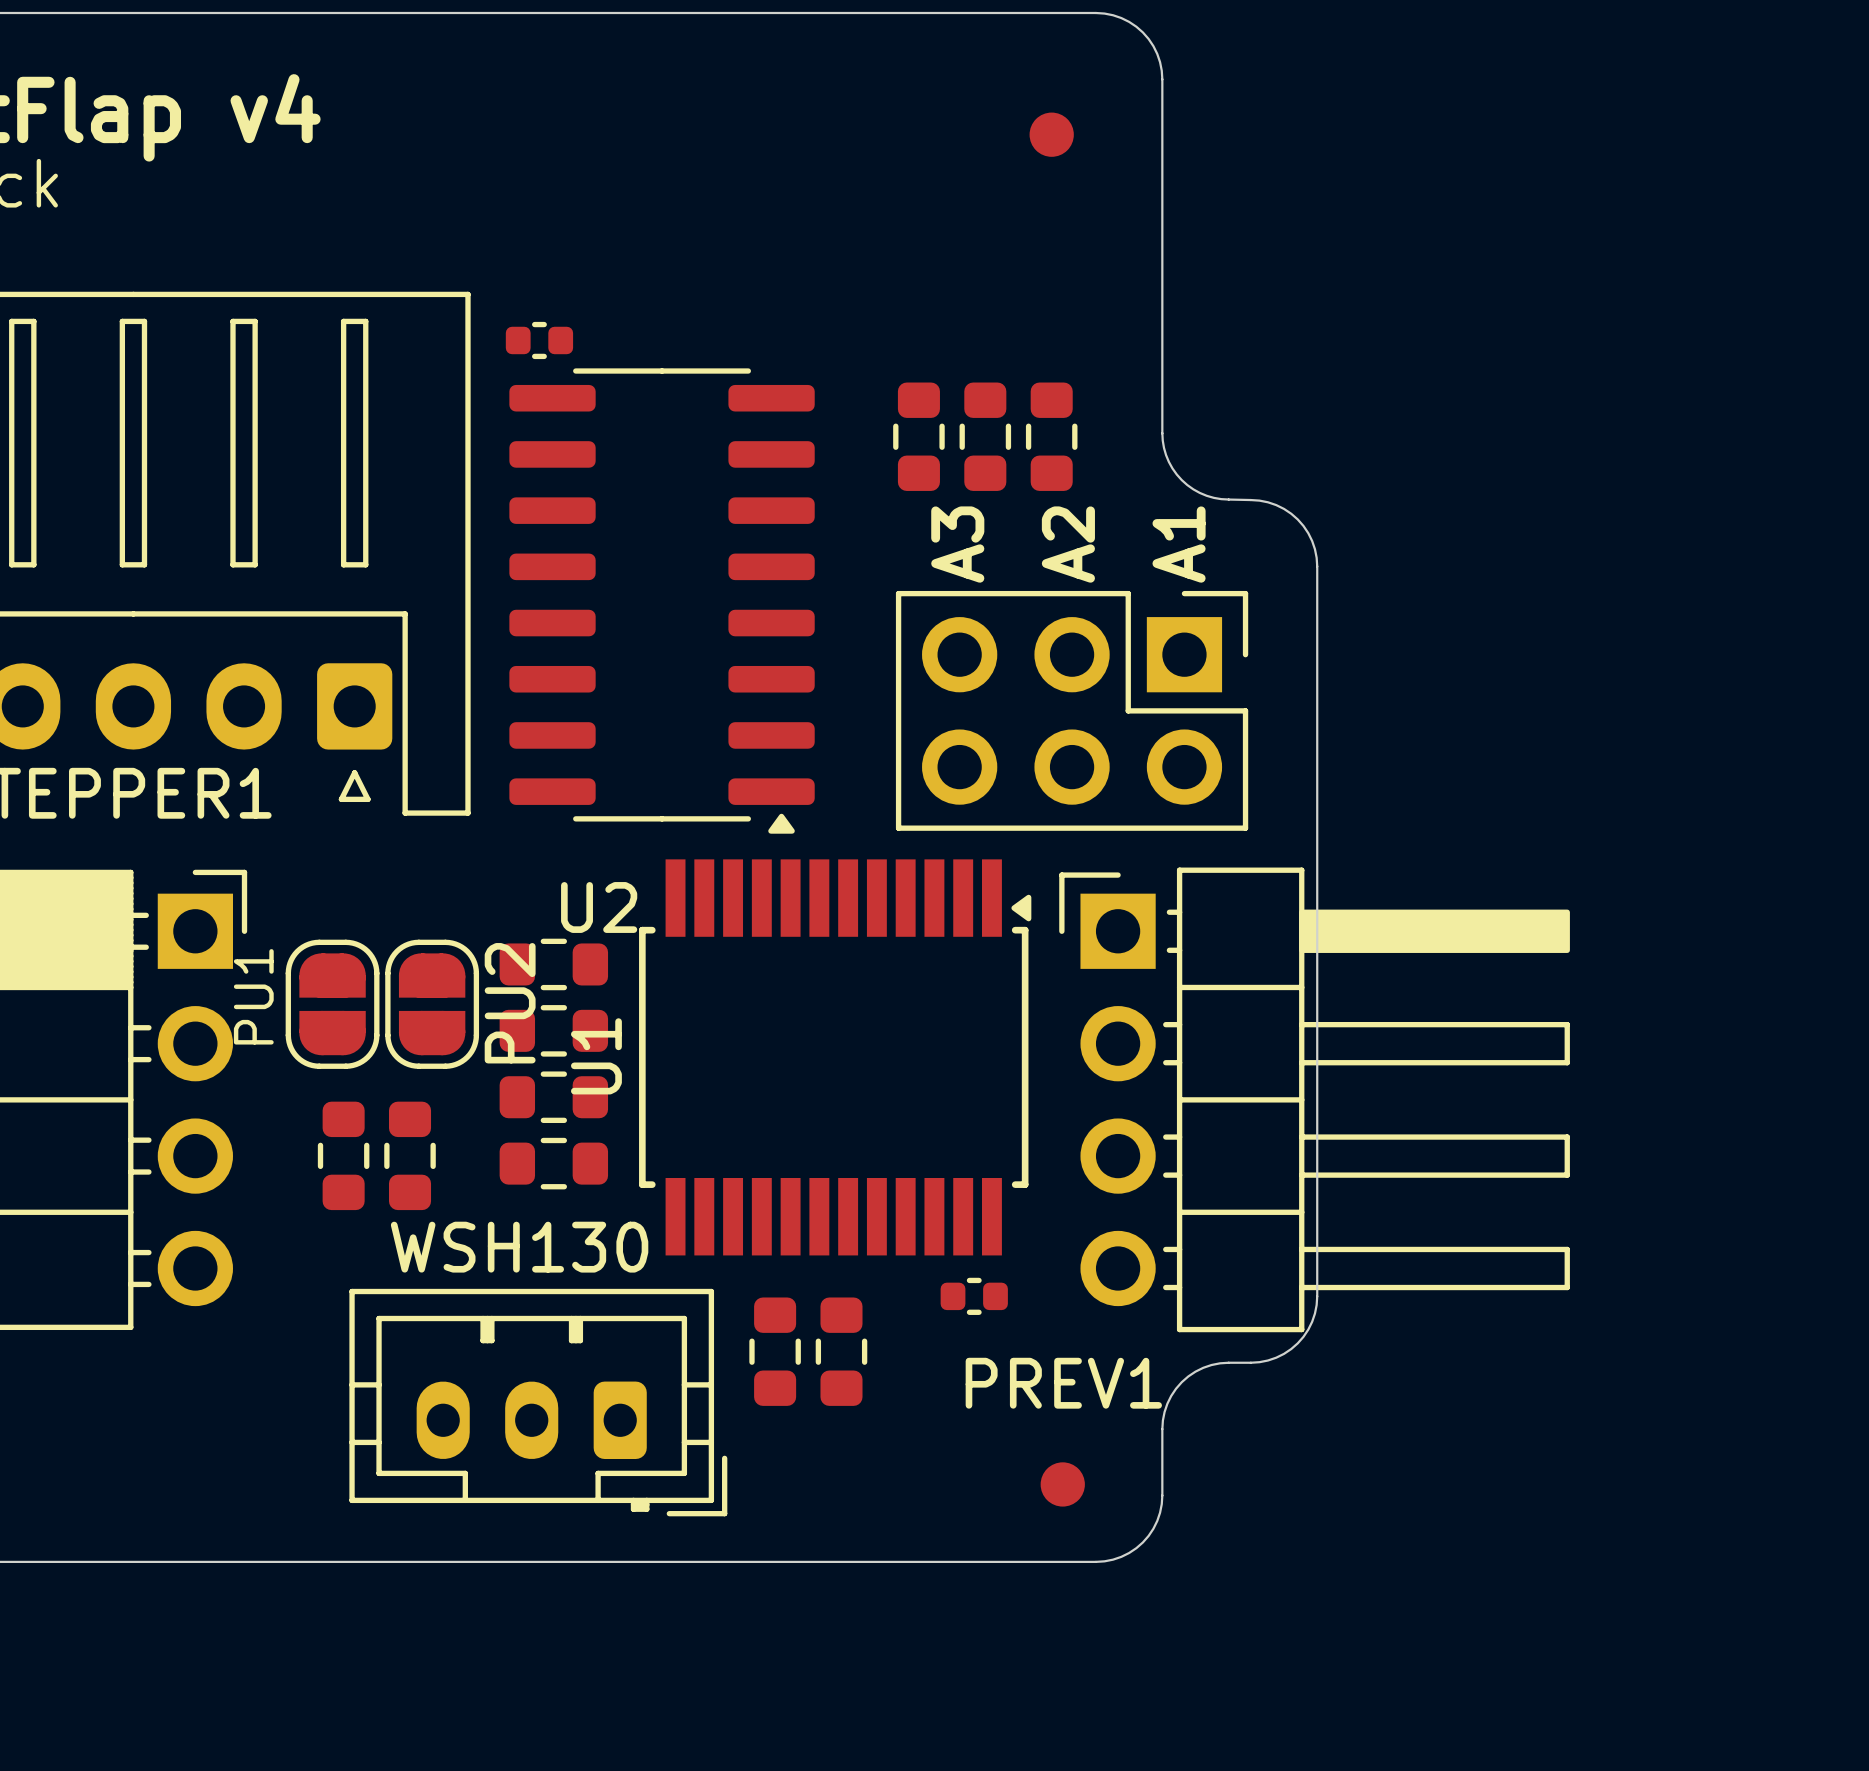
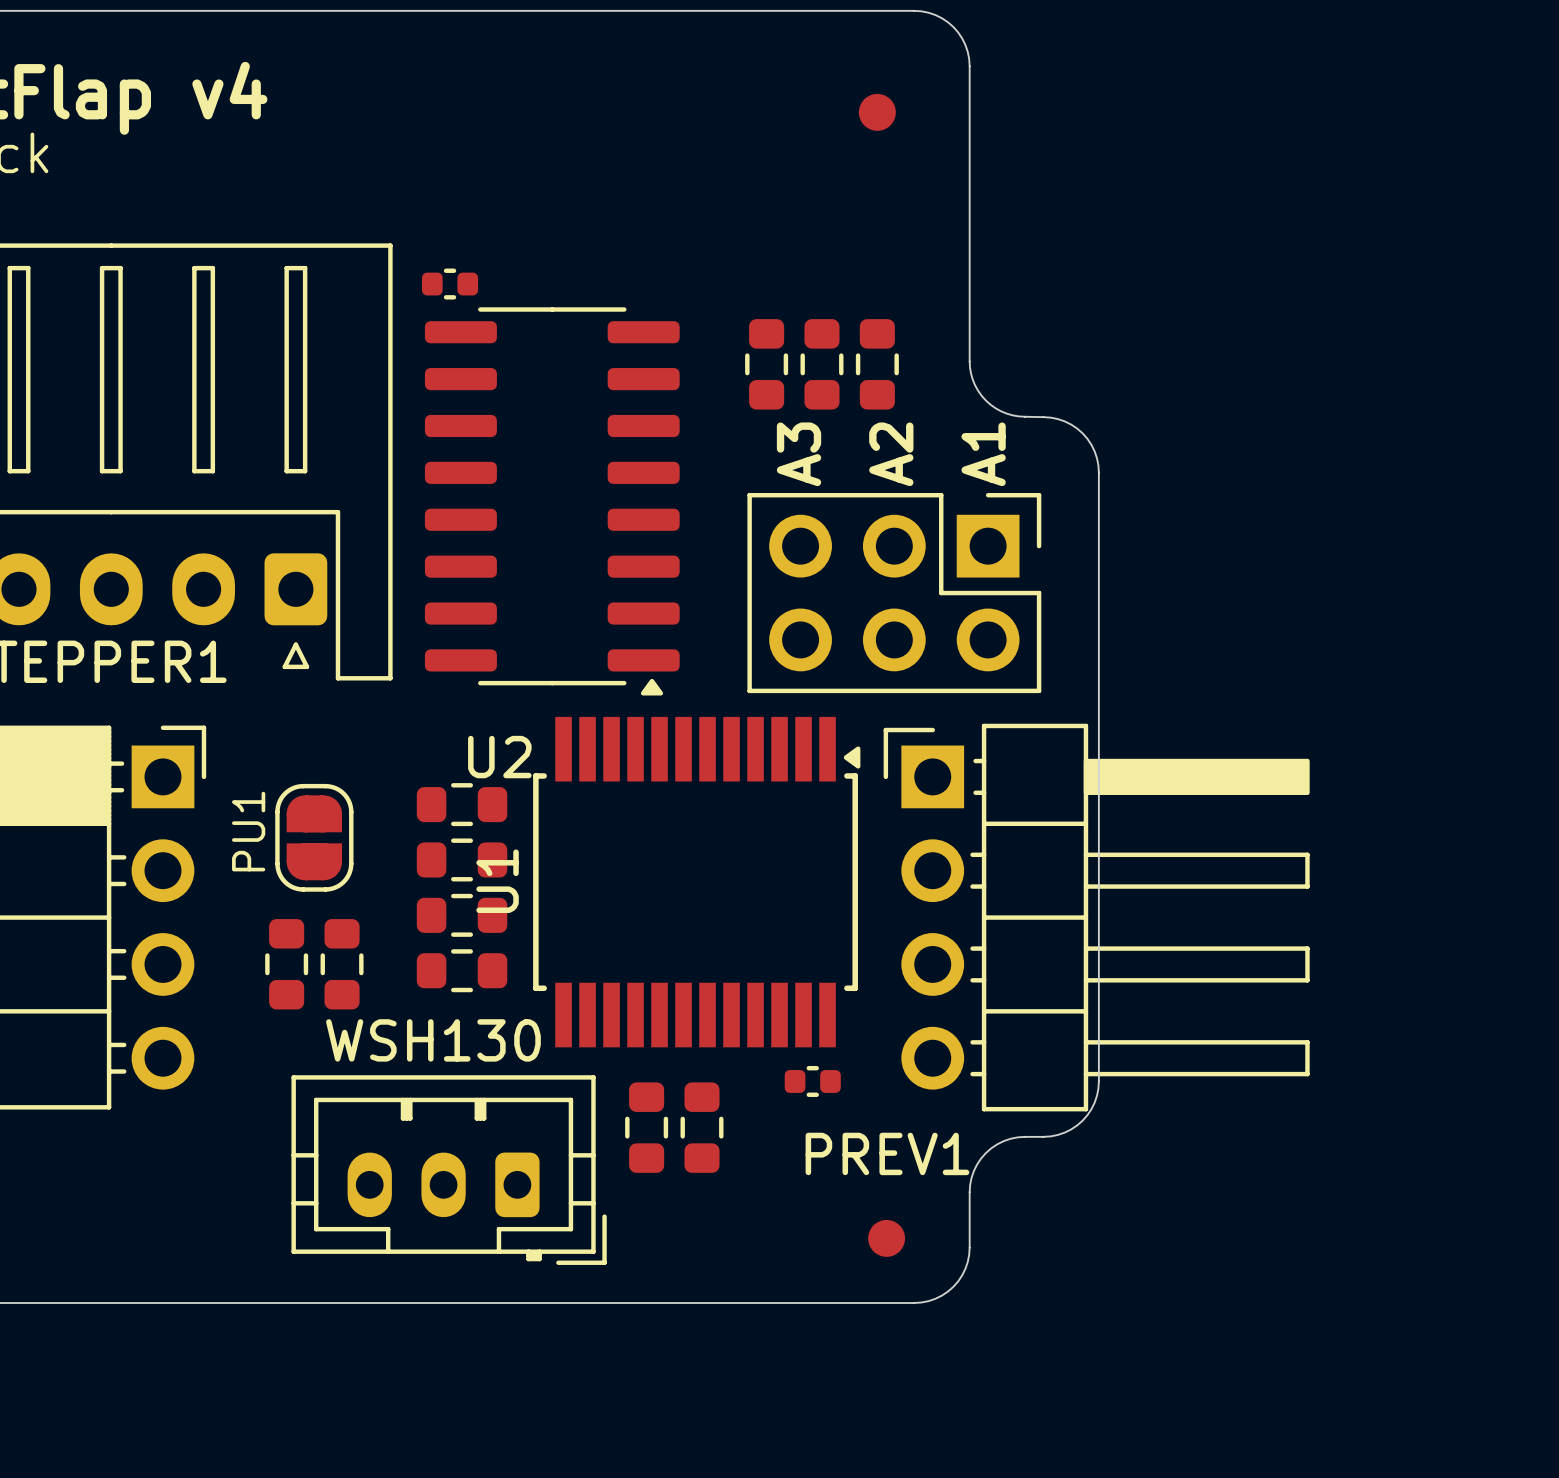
PU1 position: (332, 1004) -> (314, 837)
PU2: (432, 1004) -> none

